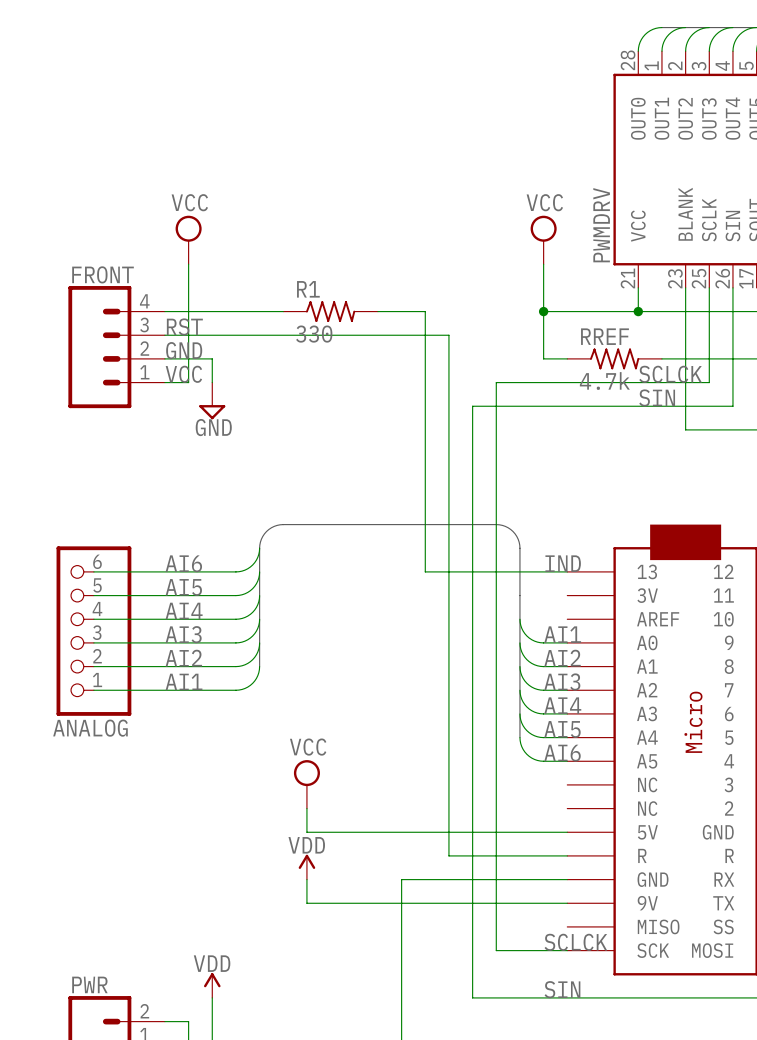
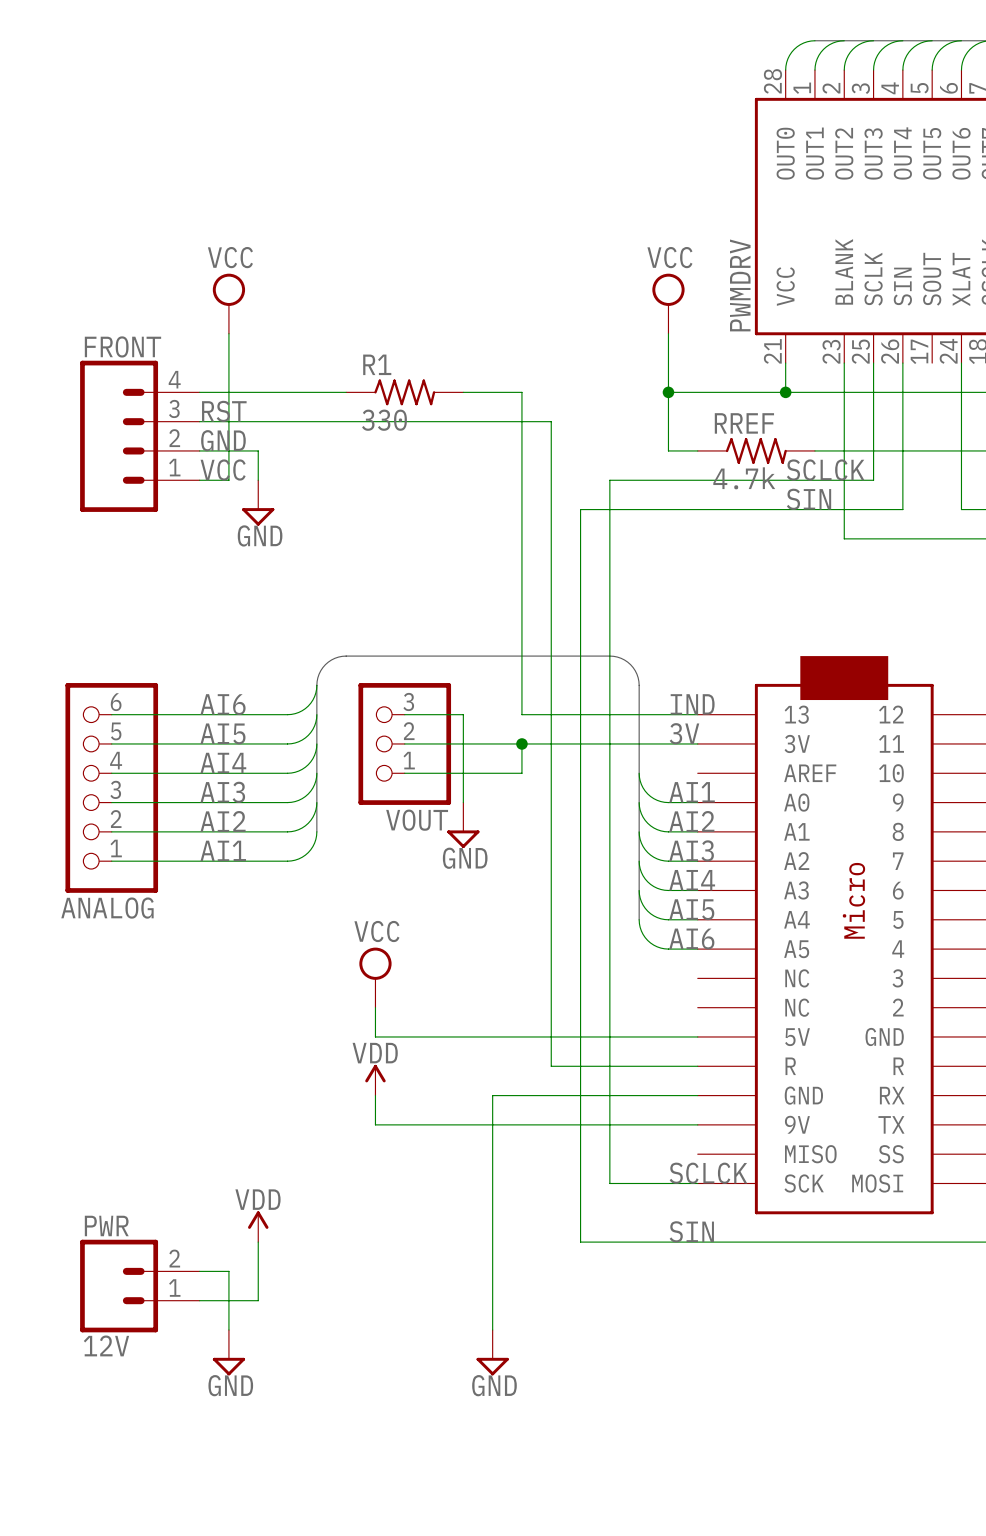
wire: none -> (404, 714) (463, 714) (463, 802)
label: none -> 3V (684, 733)
wire: none -> (404, 743) (697, 743)
VOUT: none -> (404, 743)
wire: none -> (521, 743) (521, 773) (404, 773)
junction: none -> (521, 743)
power symbol: none -> GND (463, 825)

